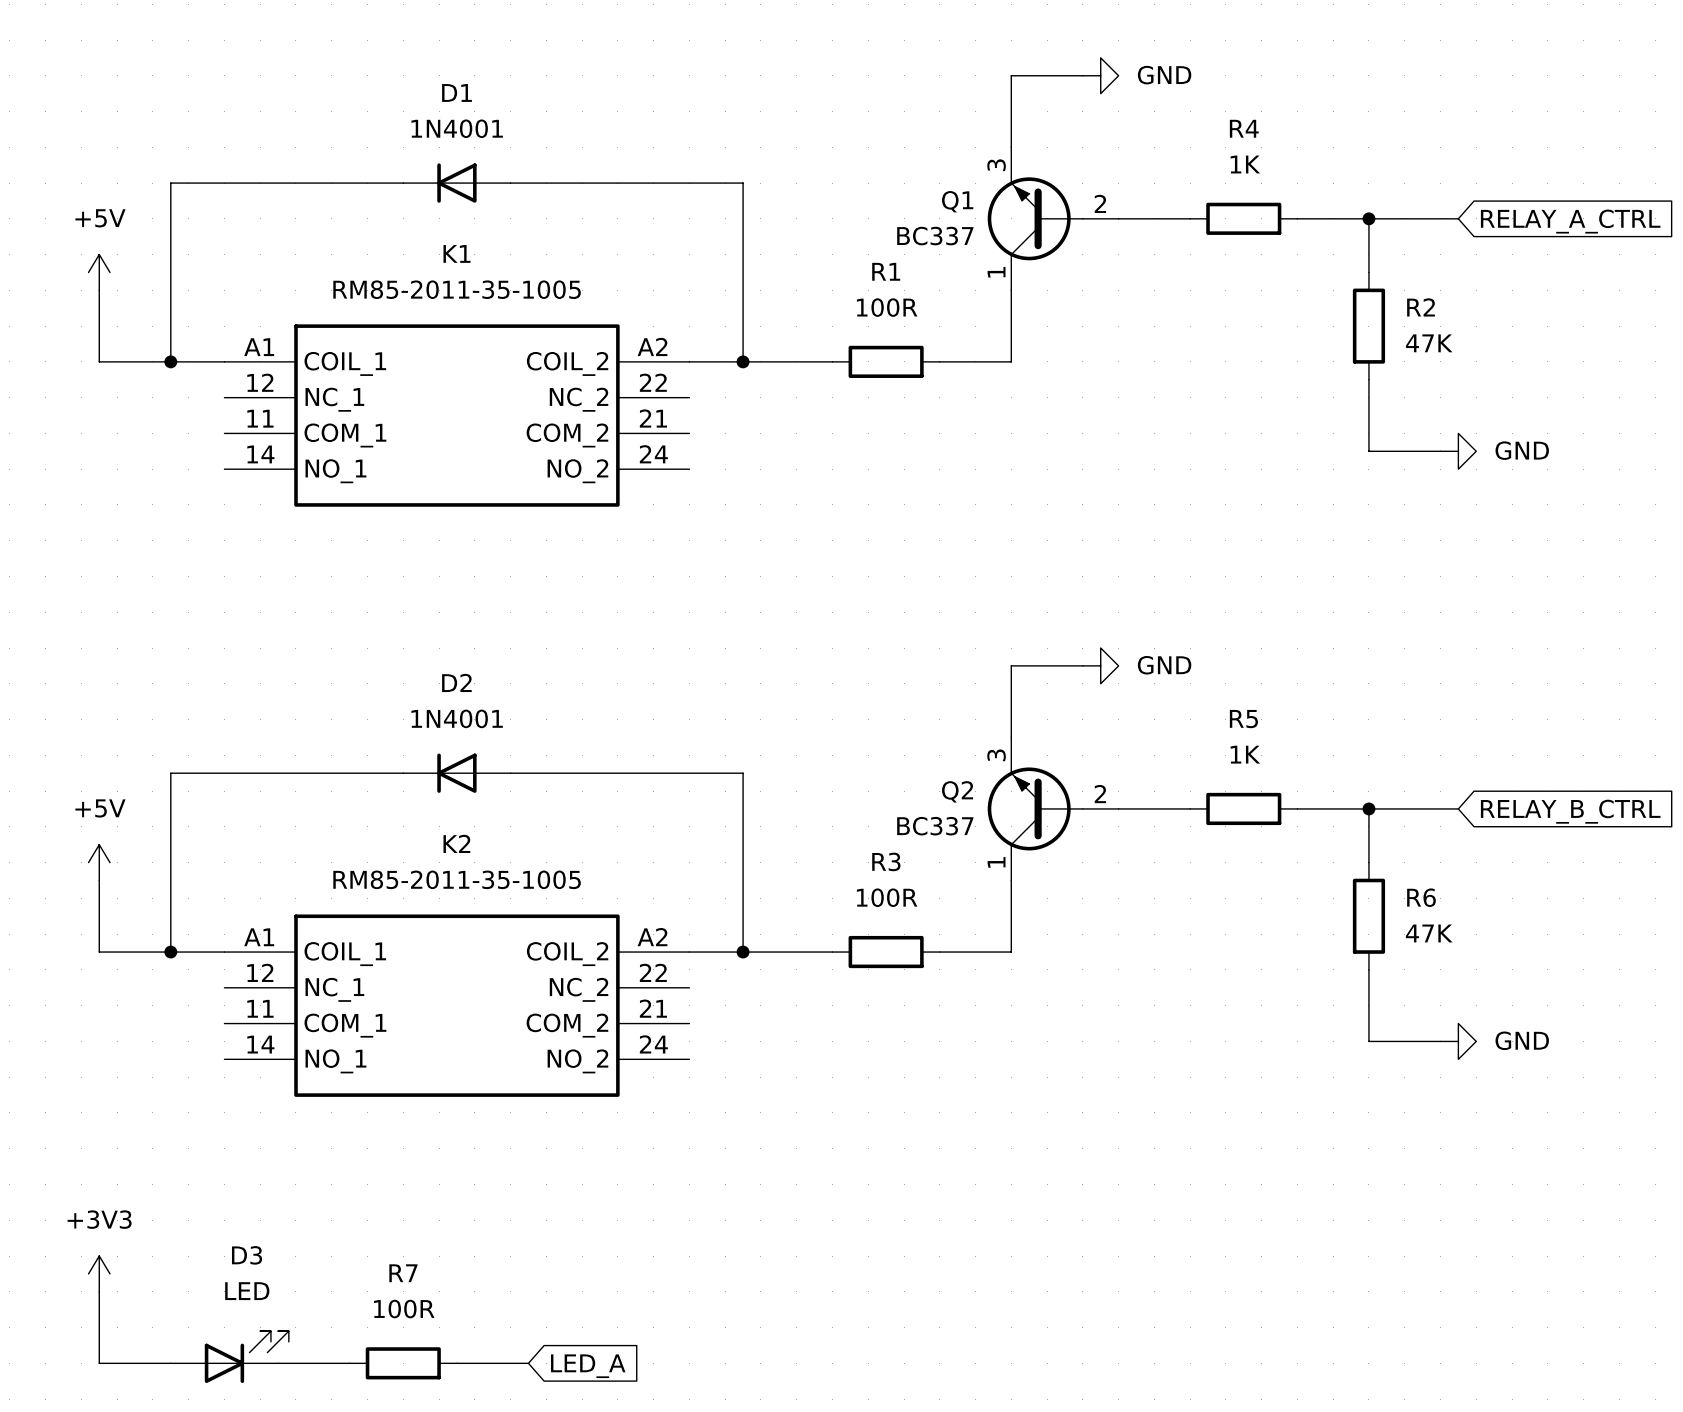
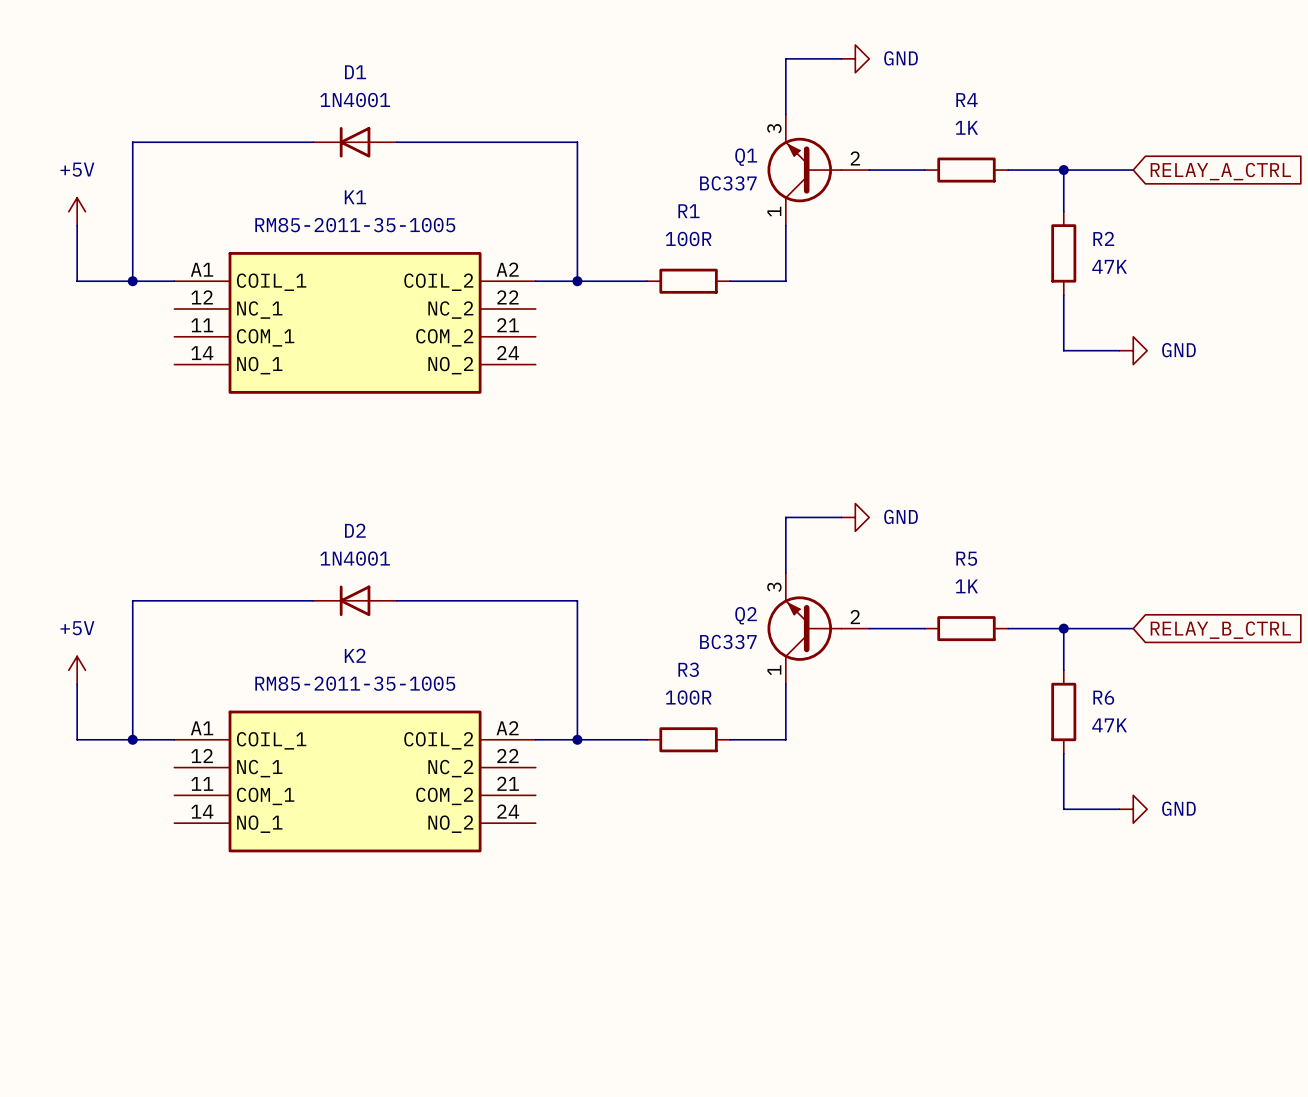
power symbol: +3V3 (99, 1273) -> none
wire: (99, 1291) (99, 1363) (170, 1363) -> none
D3: LED (229, 1357) -> none
wire: (278, 1363) (349, 1363) -> none
R7: 100R (403, 1363) -> none
wire: (456, 1363) (528, 1363) -> none
global label: LED_A (588, 1366) -> none

